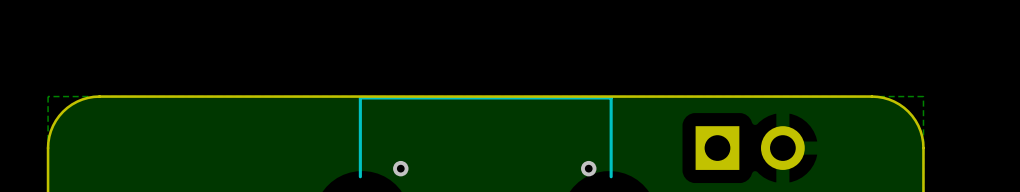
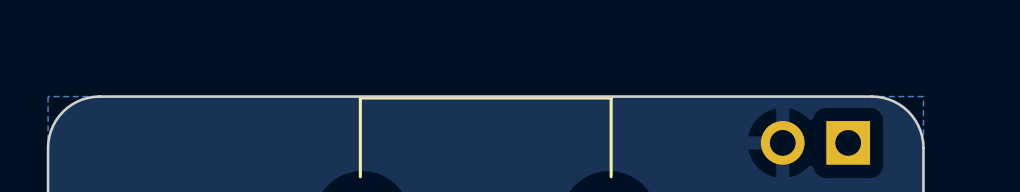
part rotation: 0° (750, 148) -> 180° (815, 142)
via: (400, 168) -> none
via: (588, 168) -> none

